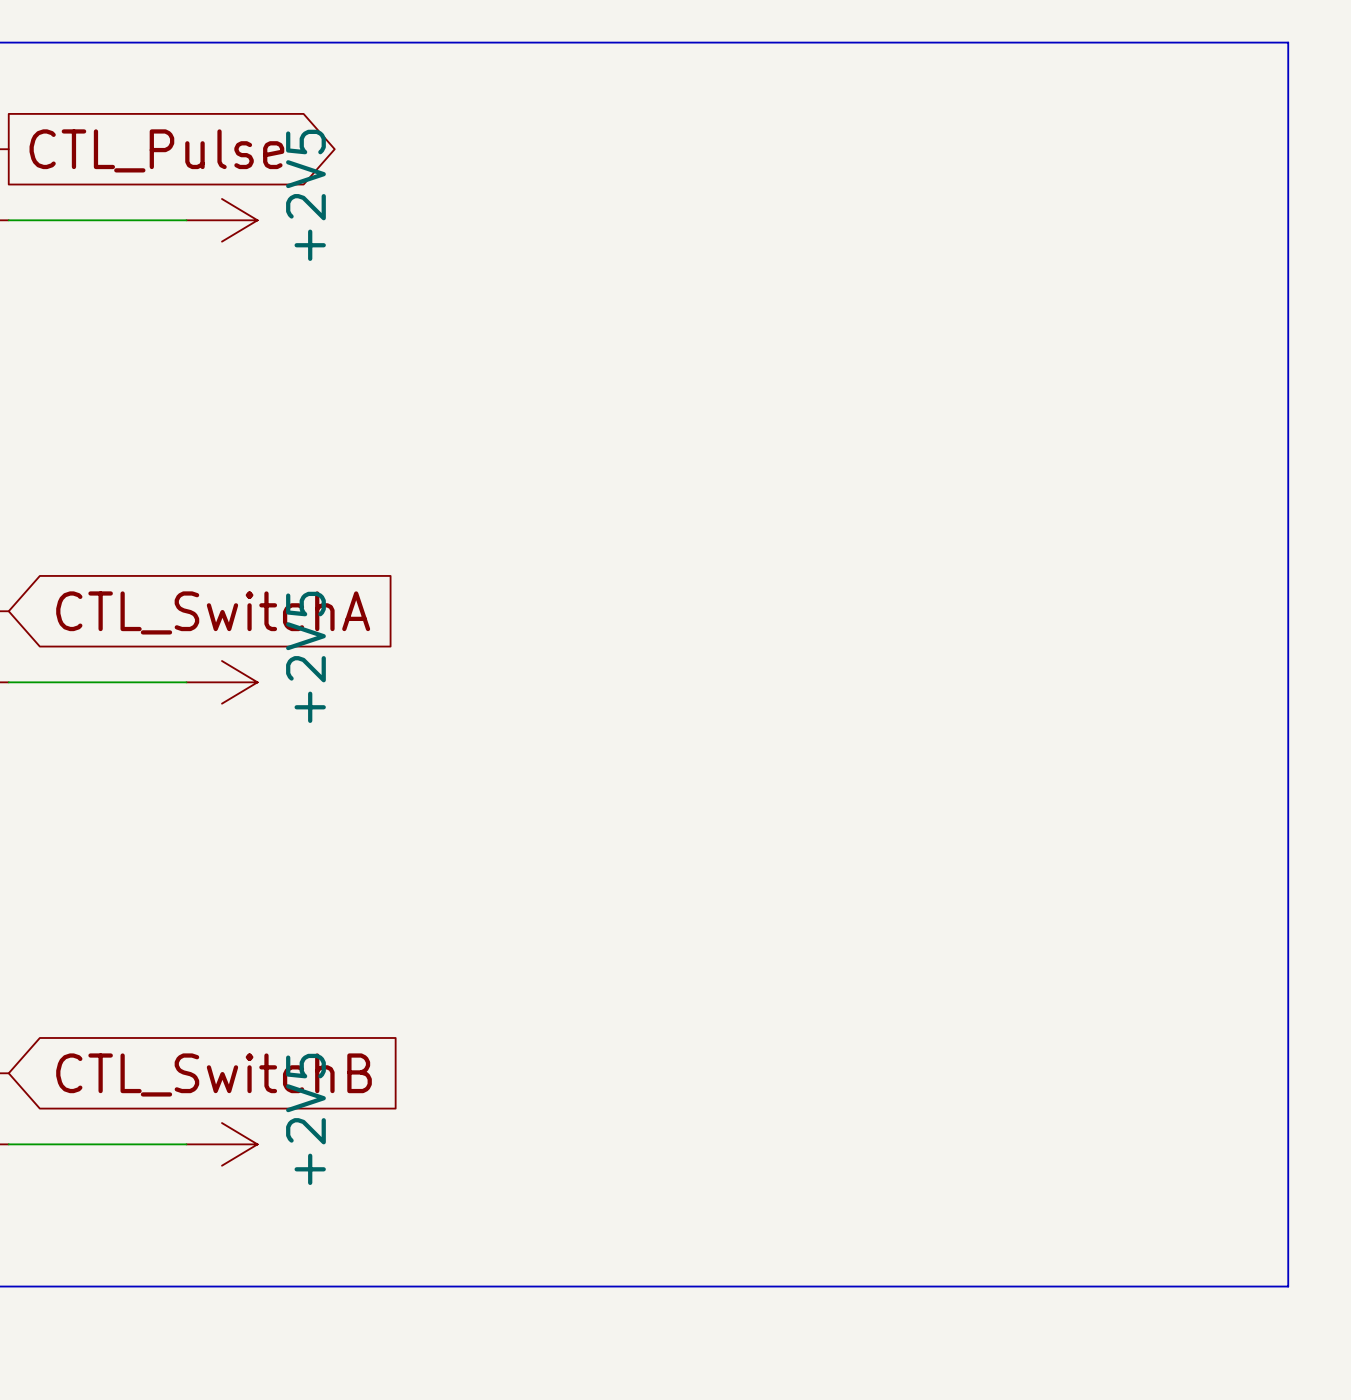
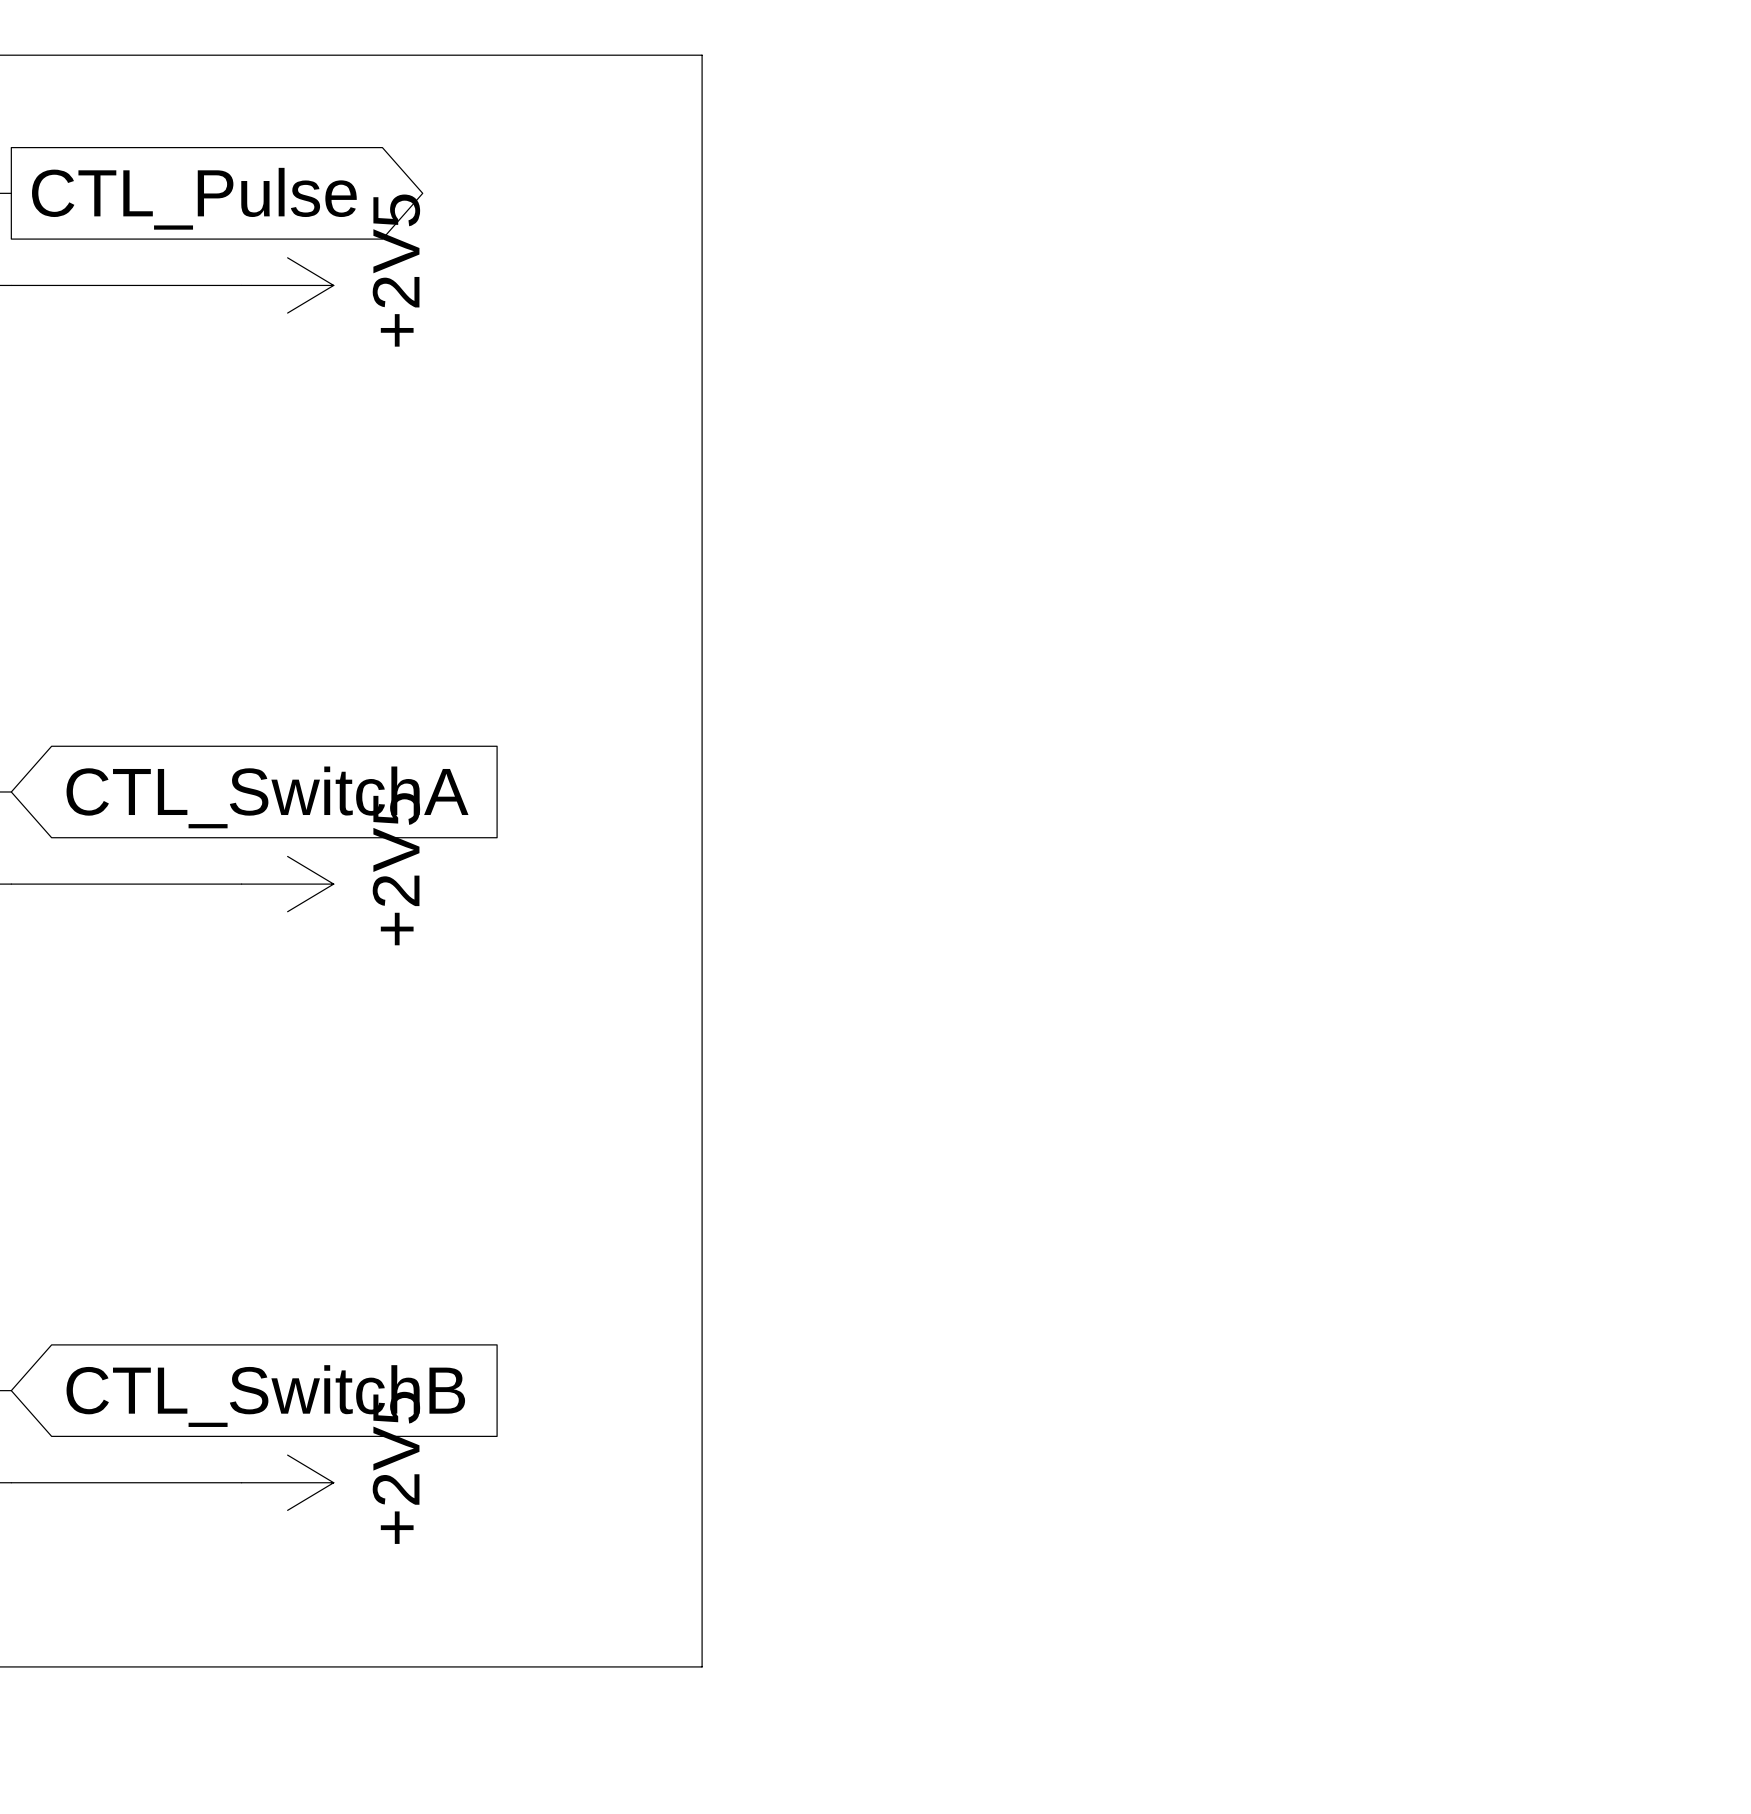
line: (541, 42) (1288, 42) (1288, 1286) (541, 1286) -> (702, 55) (702, 1666)

